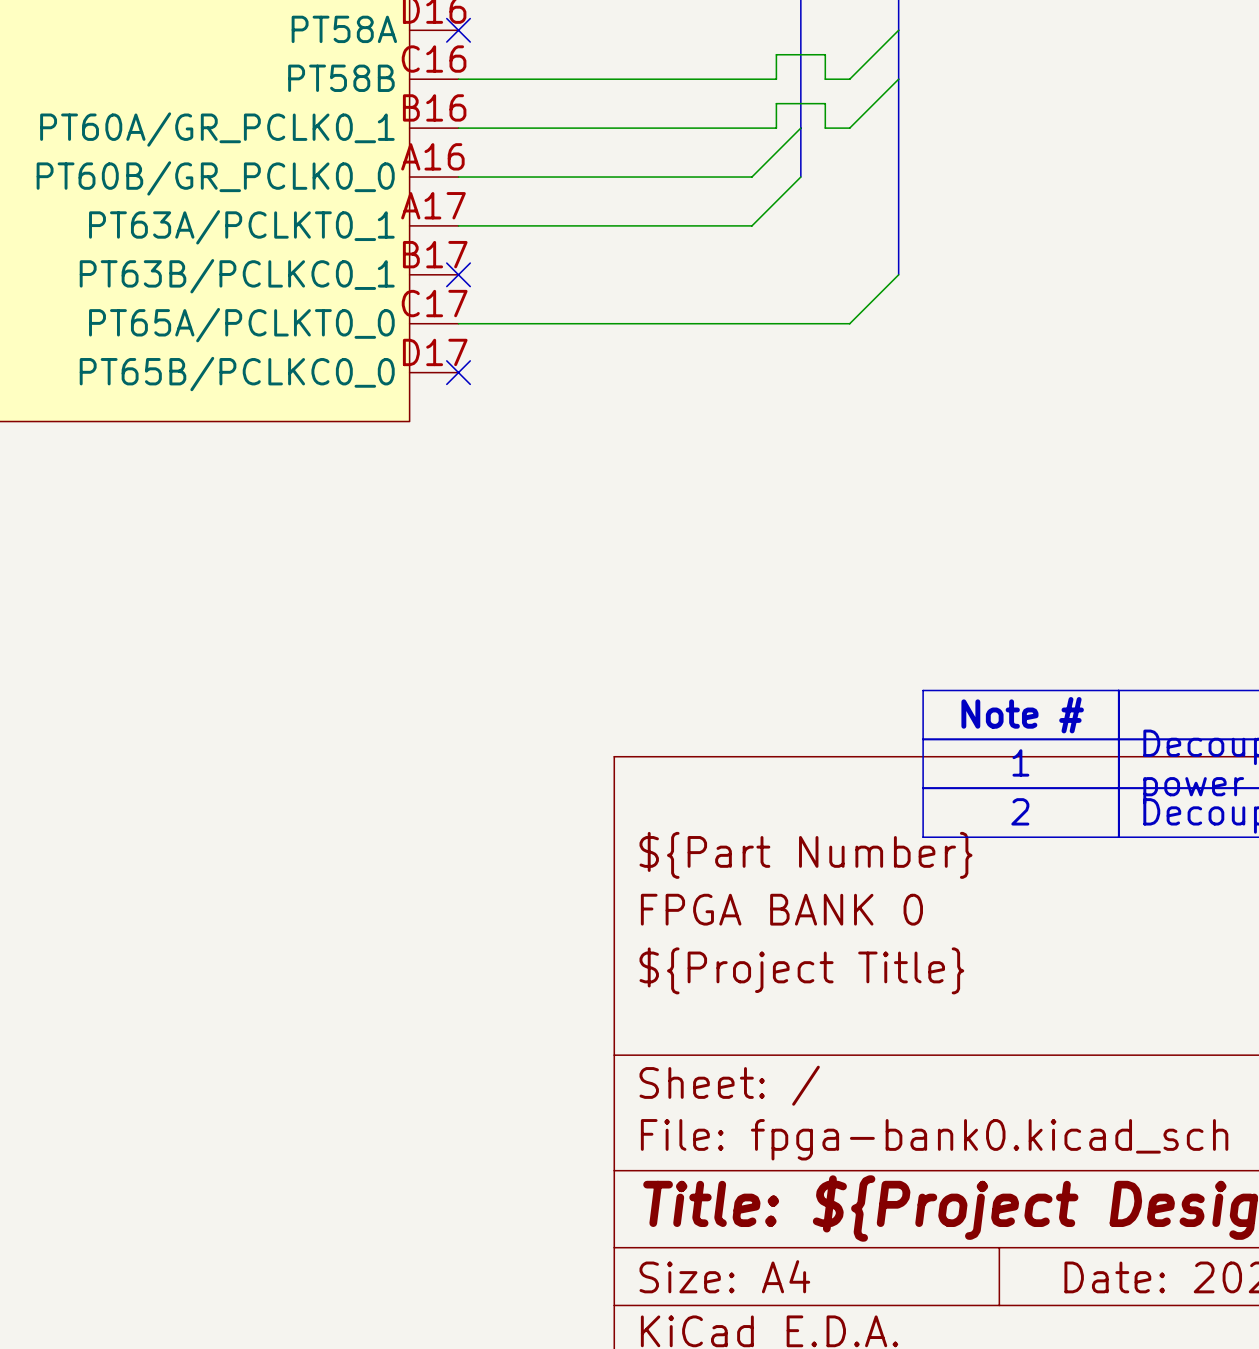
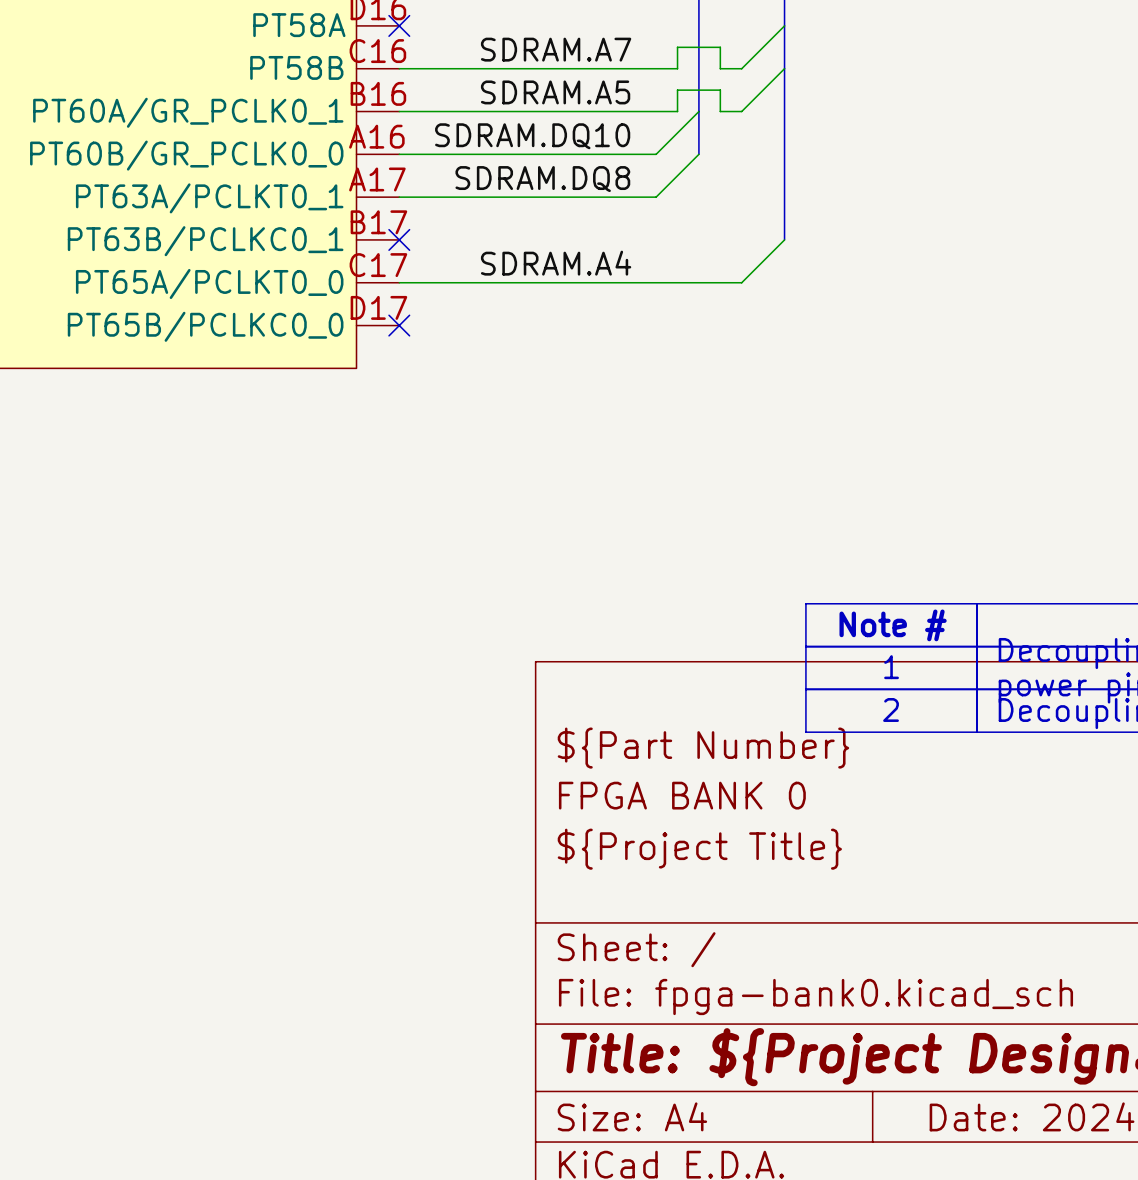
label: none -> SDRAM.A7 (556, 49)
label: none -> SDRAM.A5 (555, 92)
label: none -> SDRAM.DQ10 (532, 136)
label: none -> SDRAM.DQ8 (542, 179)
label: none -> SDRAM.A4 (556, 263)

